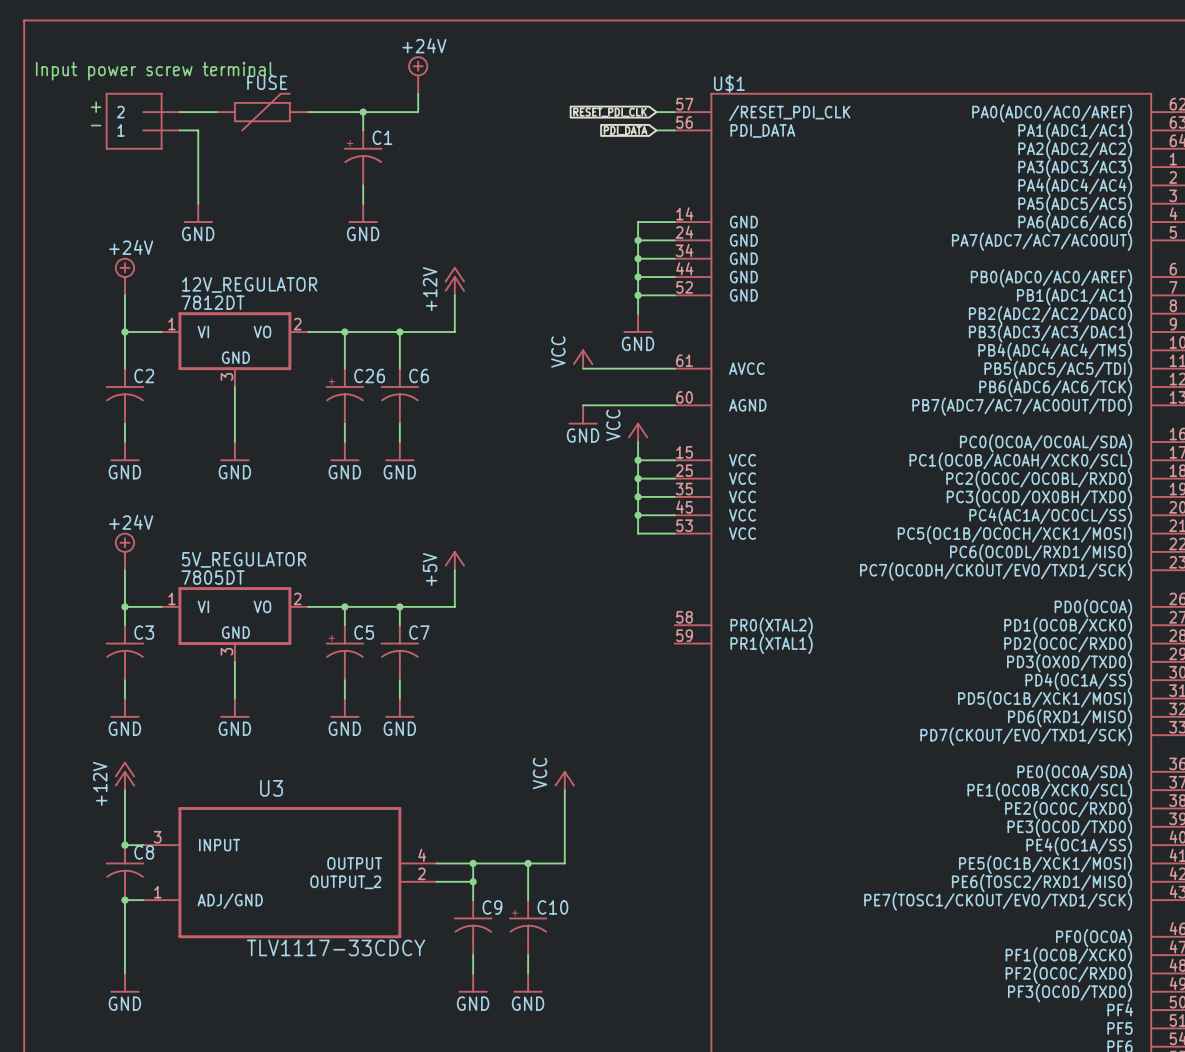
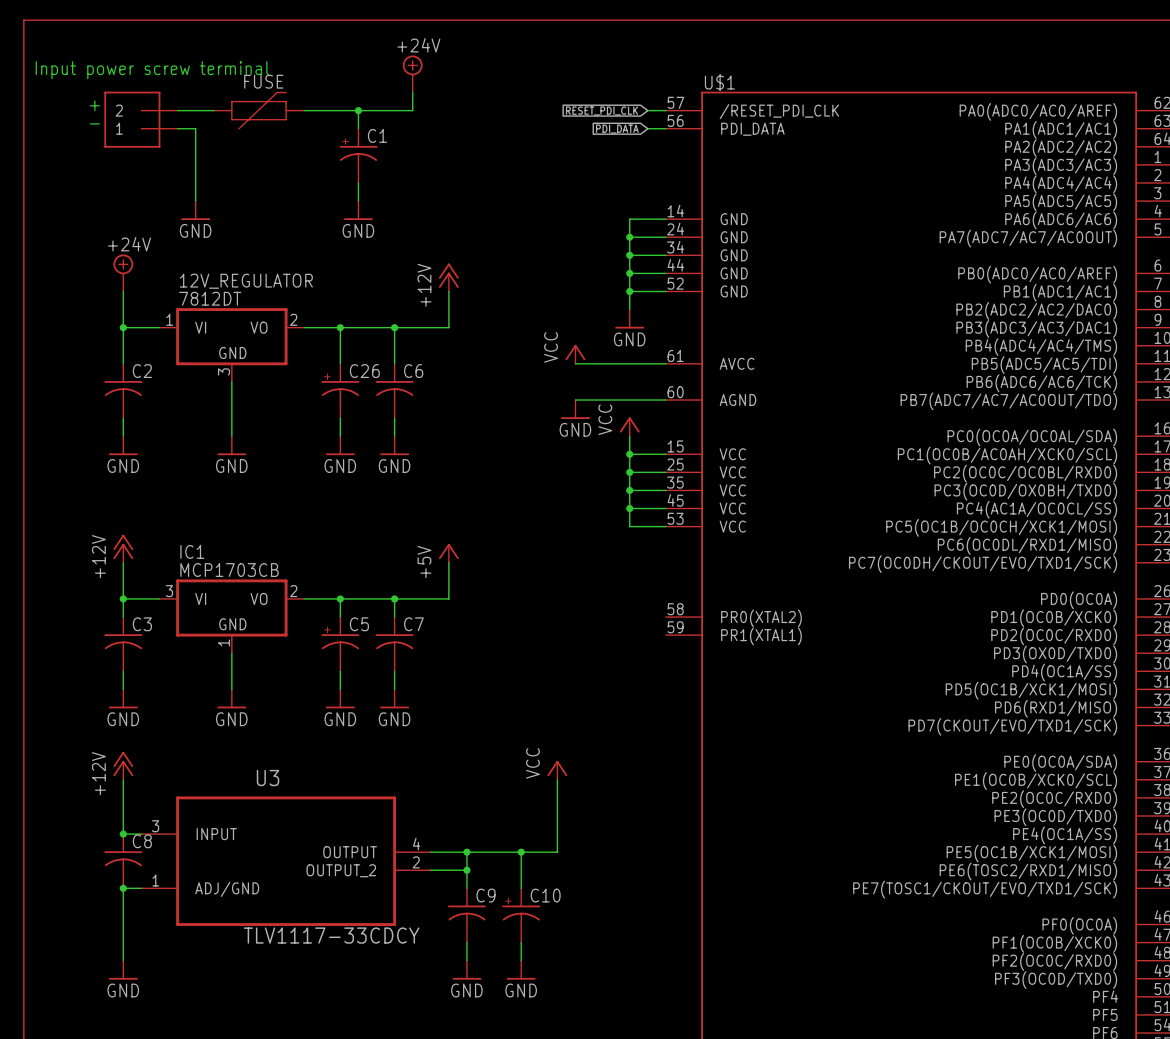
power symbol: +24V (124, 551) -> +12V (123, 548)
5V_REGULATOR name: 5V_REGULATOR (244, 559) -> IC1 (192, 551)
5V_REGULATOR value: 7805DT (213, 577) -> MCP1703CB (229, 570)
5V_REGULATOR pin number: 1 (171, 598) -> 3 (169, 591)
5V_REGULATOR pin number: 3 (226, 651) -> 1 (224, 642)

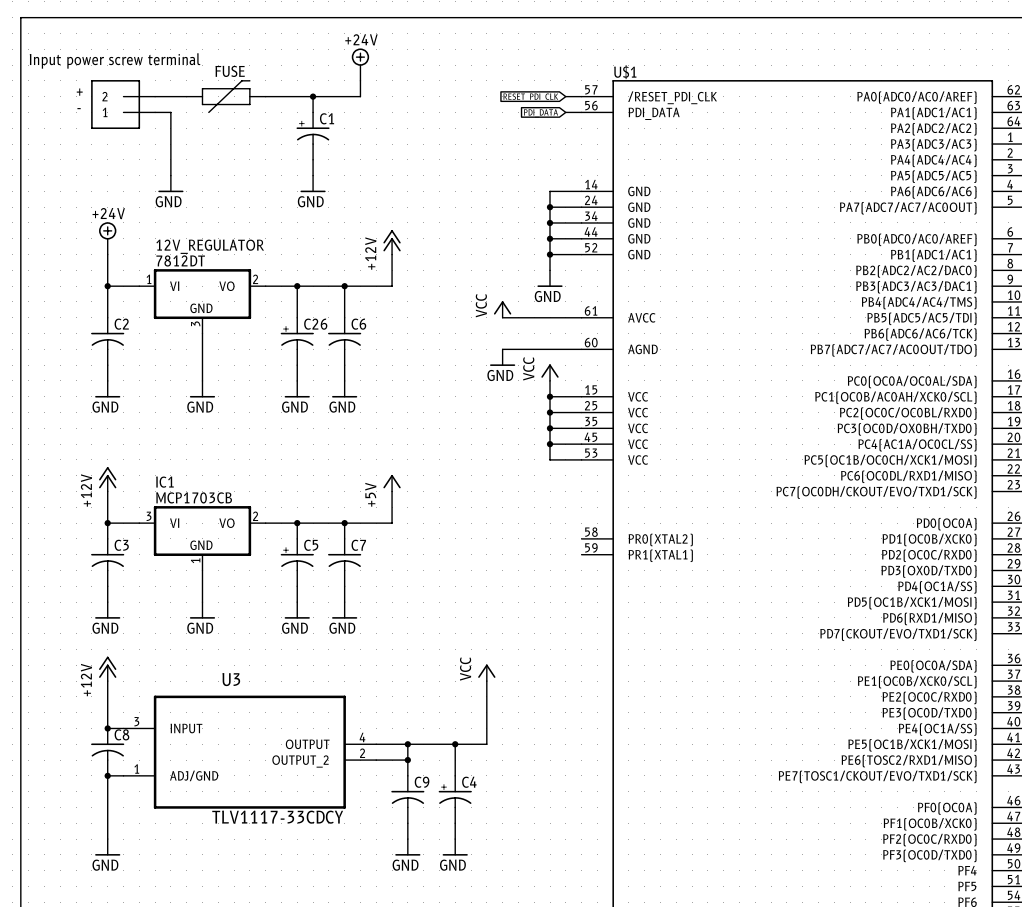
C10 name: C10 (545, 895) -> C4 (469, 782)

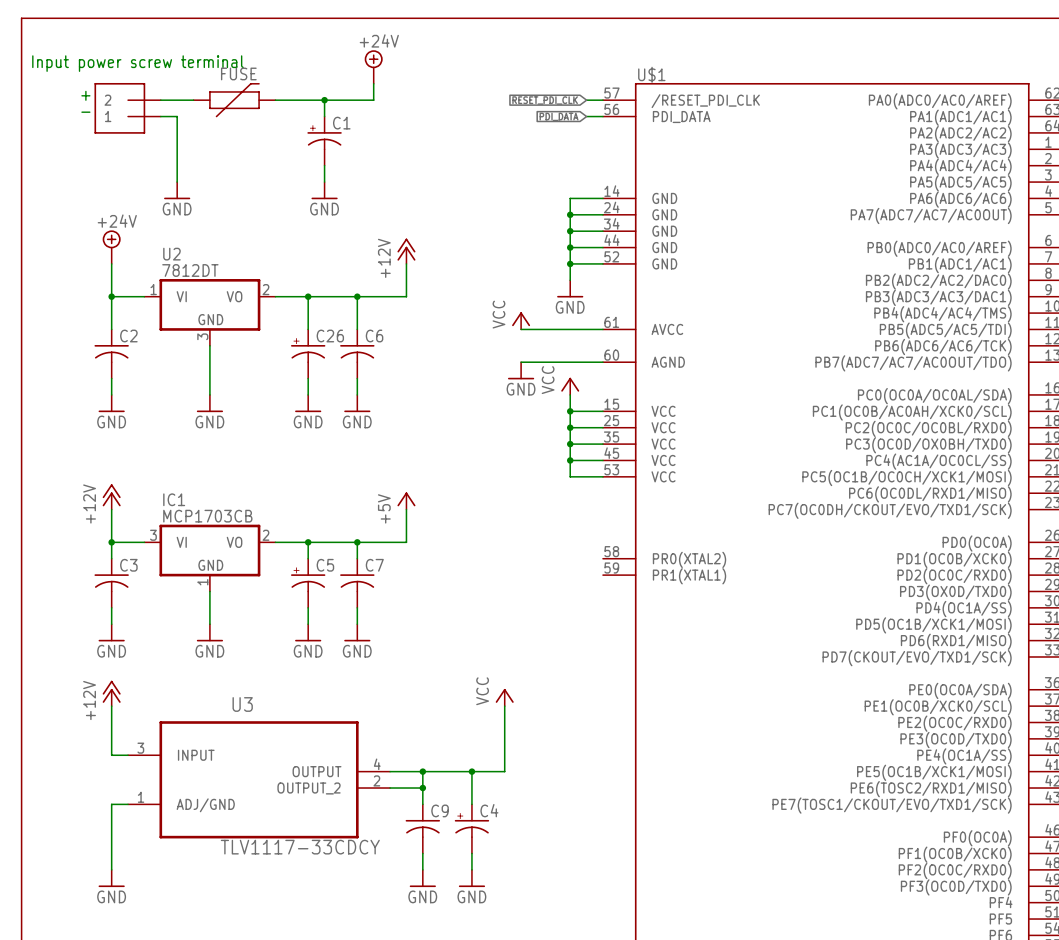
12V_REGULATOR name: 12V_REGULATOR (210, 246) -> U2 (171, 254)
junction: (107, 728) -> none
C8: (107, 752) -> none
junction: (107, 775) -> none

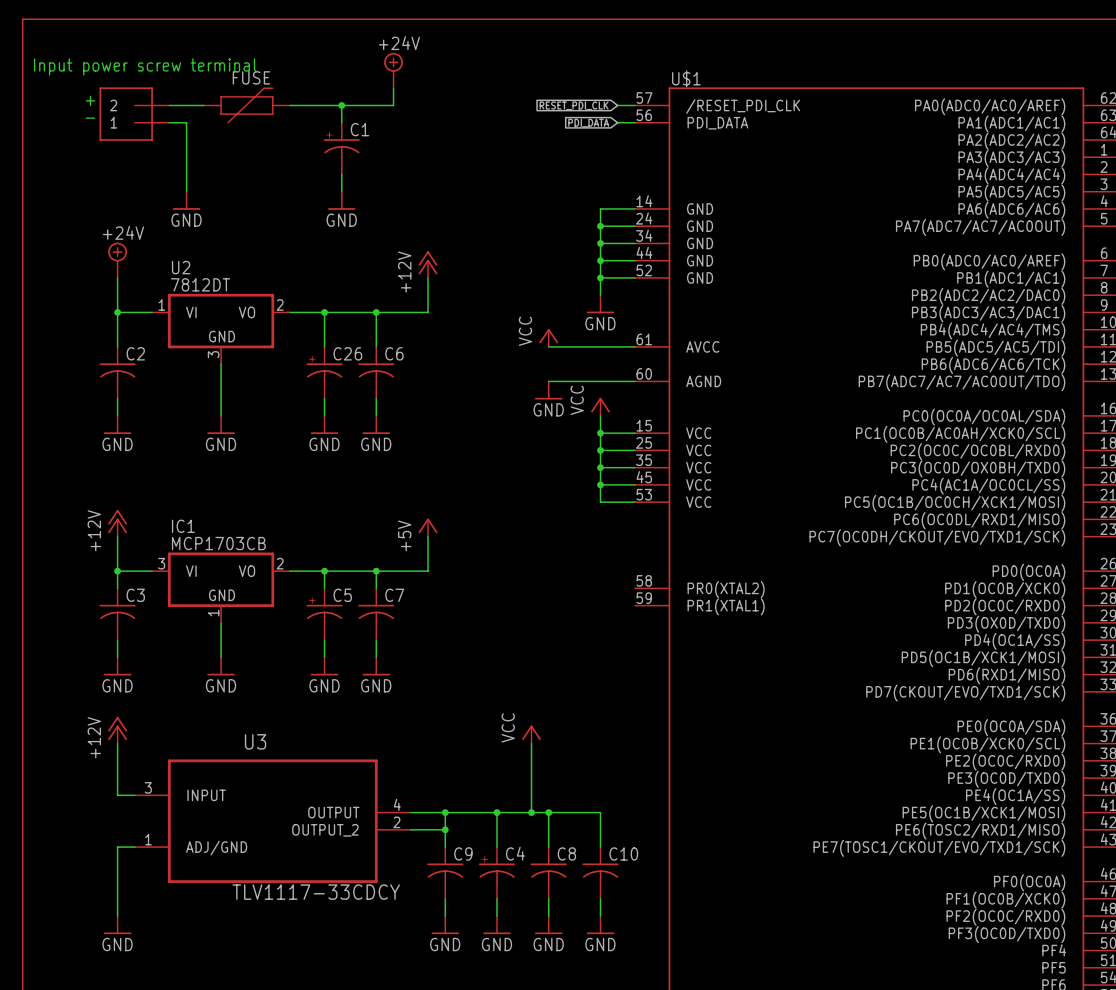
wire: none -> (531, 812) (600, 812) (600, 847)
junction: none -> (531, 812)
wire: none -> (548, 812) (548, 847)
junction: none -> (548, 812)
C8: none -> (548, 872)
C10: none -> (600, 872)
wire: none -> (548, 898) (548, 916)
wire: none -> (600, 898) (600, 916)
power symbol: none -> GND (548, 925)
power symbol: none -> GND (600, 925)

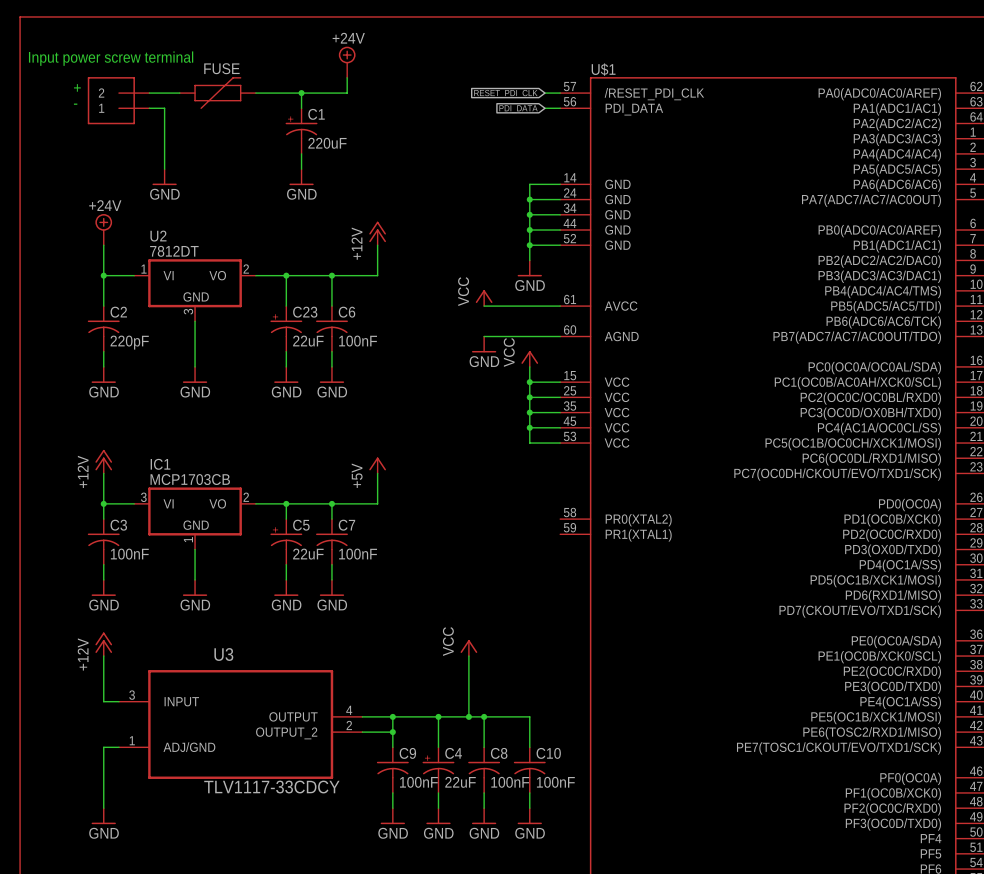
C1 value: none -> 220uF (327, 143)
C26 name: C26 (347, 353) -> C23 (305, 312)
C26 value: none -> 22uF (308, 341)
C6 value: none -> 100nF (358, 341)
C2 value: none -> 220pF (129, 342)
C3 value: none -> 100nF (129, 554)
C5 value: none -> 22uF (308, 554)
C7 value: none -> 100nF (358, 554)
C9 value: none -> 100nF (418, 782)
C4 value: none -> 22uF (460, 782)
C8 value: none -> 100nF (510, 782)
C10 value: none -> 100nF (555, 782)

